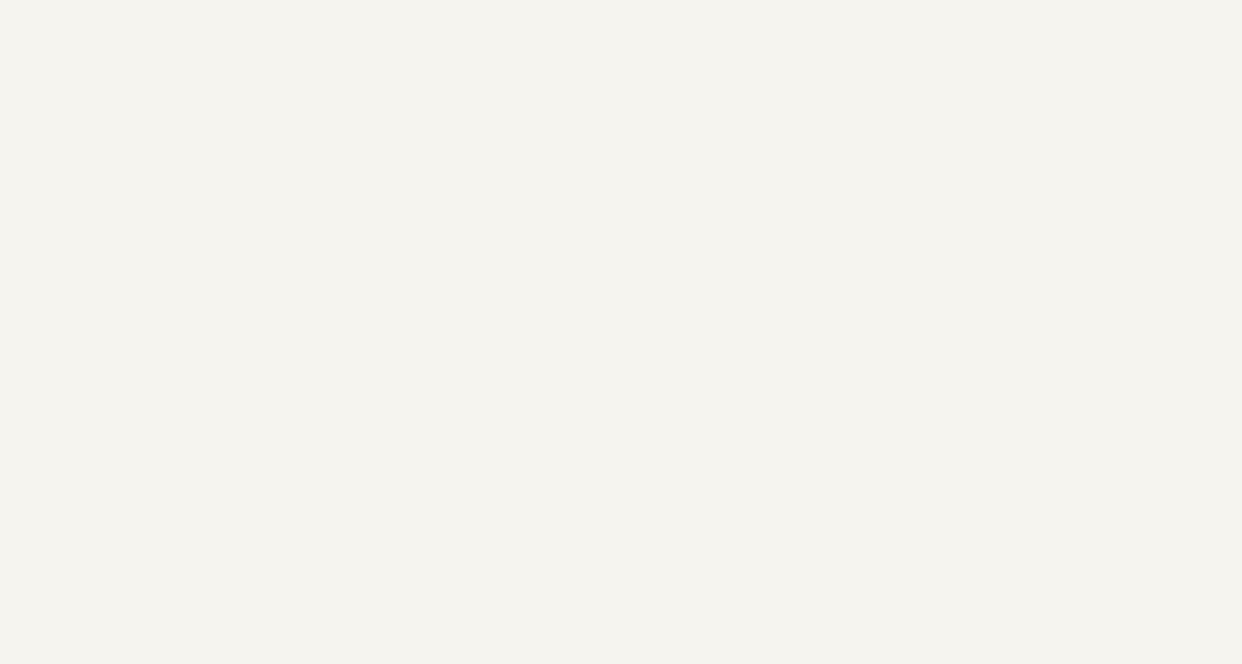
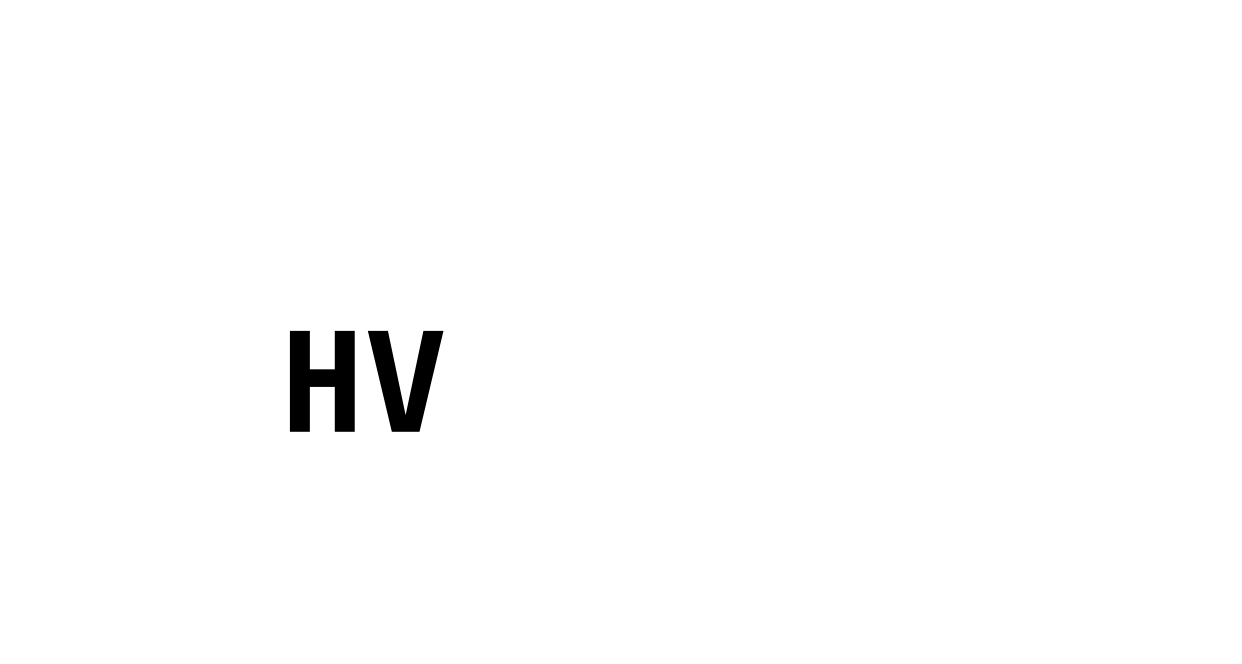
text: none -> HV (366, 381)

